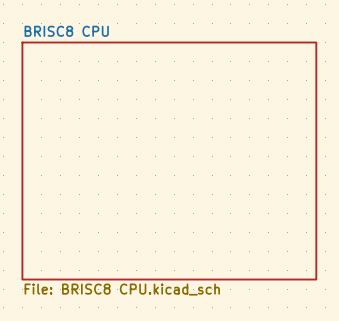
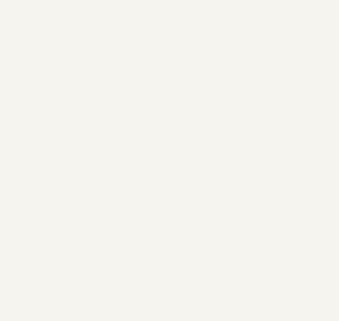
sheet BRISC8 CPU: File: BRISC8 CPU.kicad_sch (169, 161) -> none

